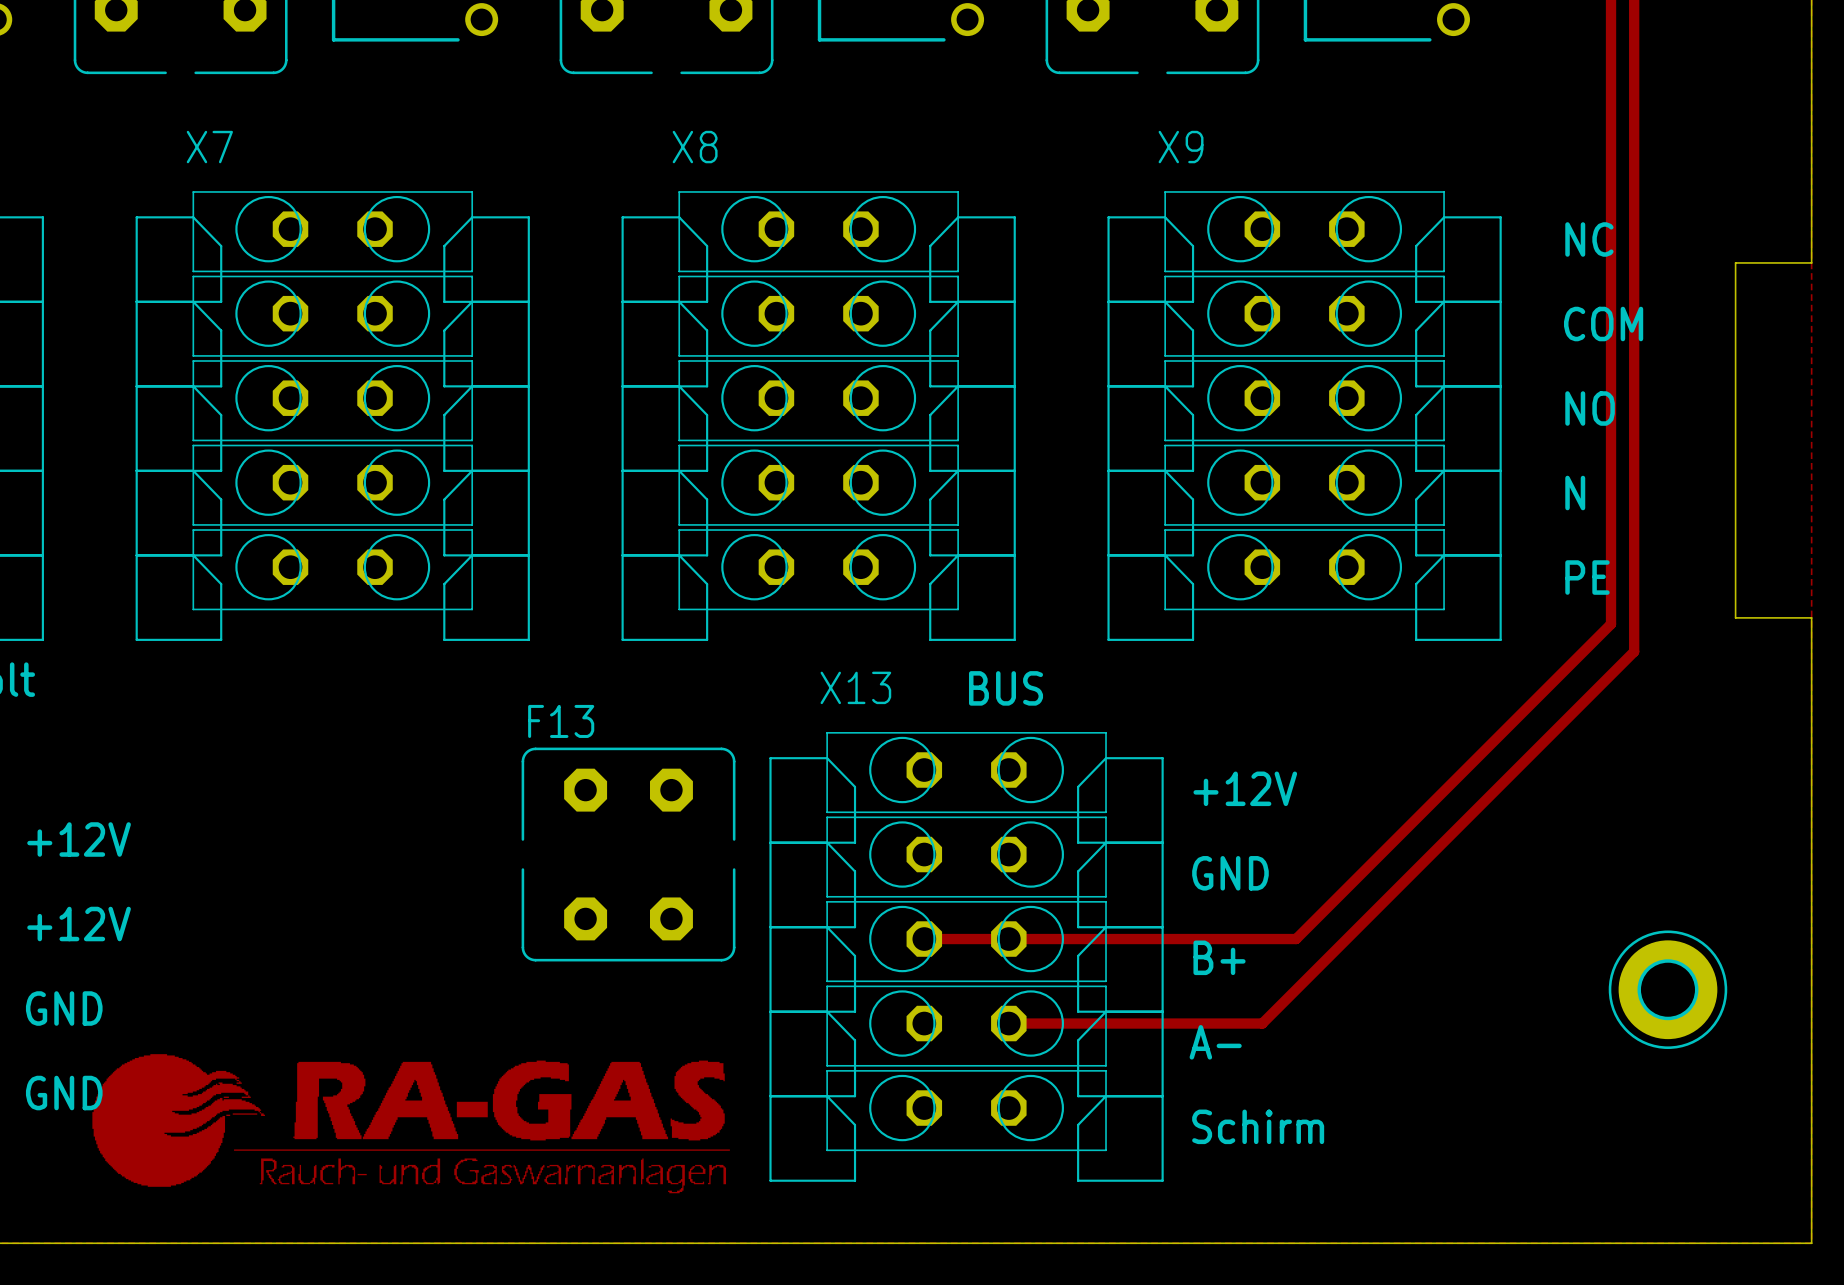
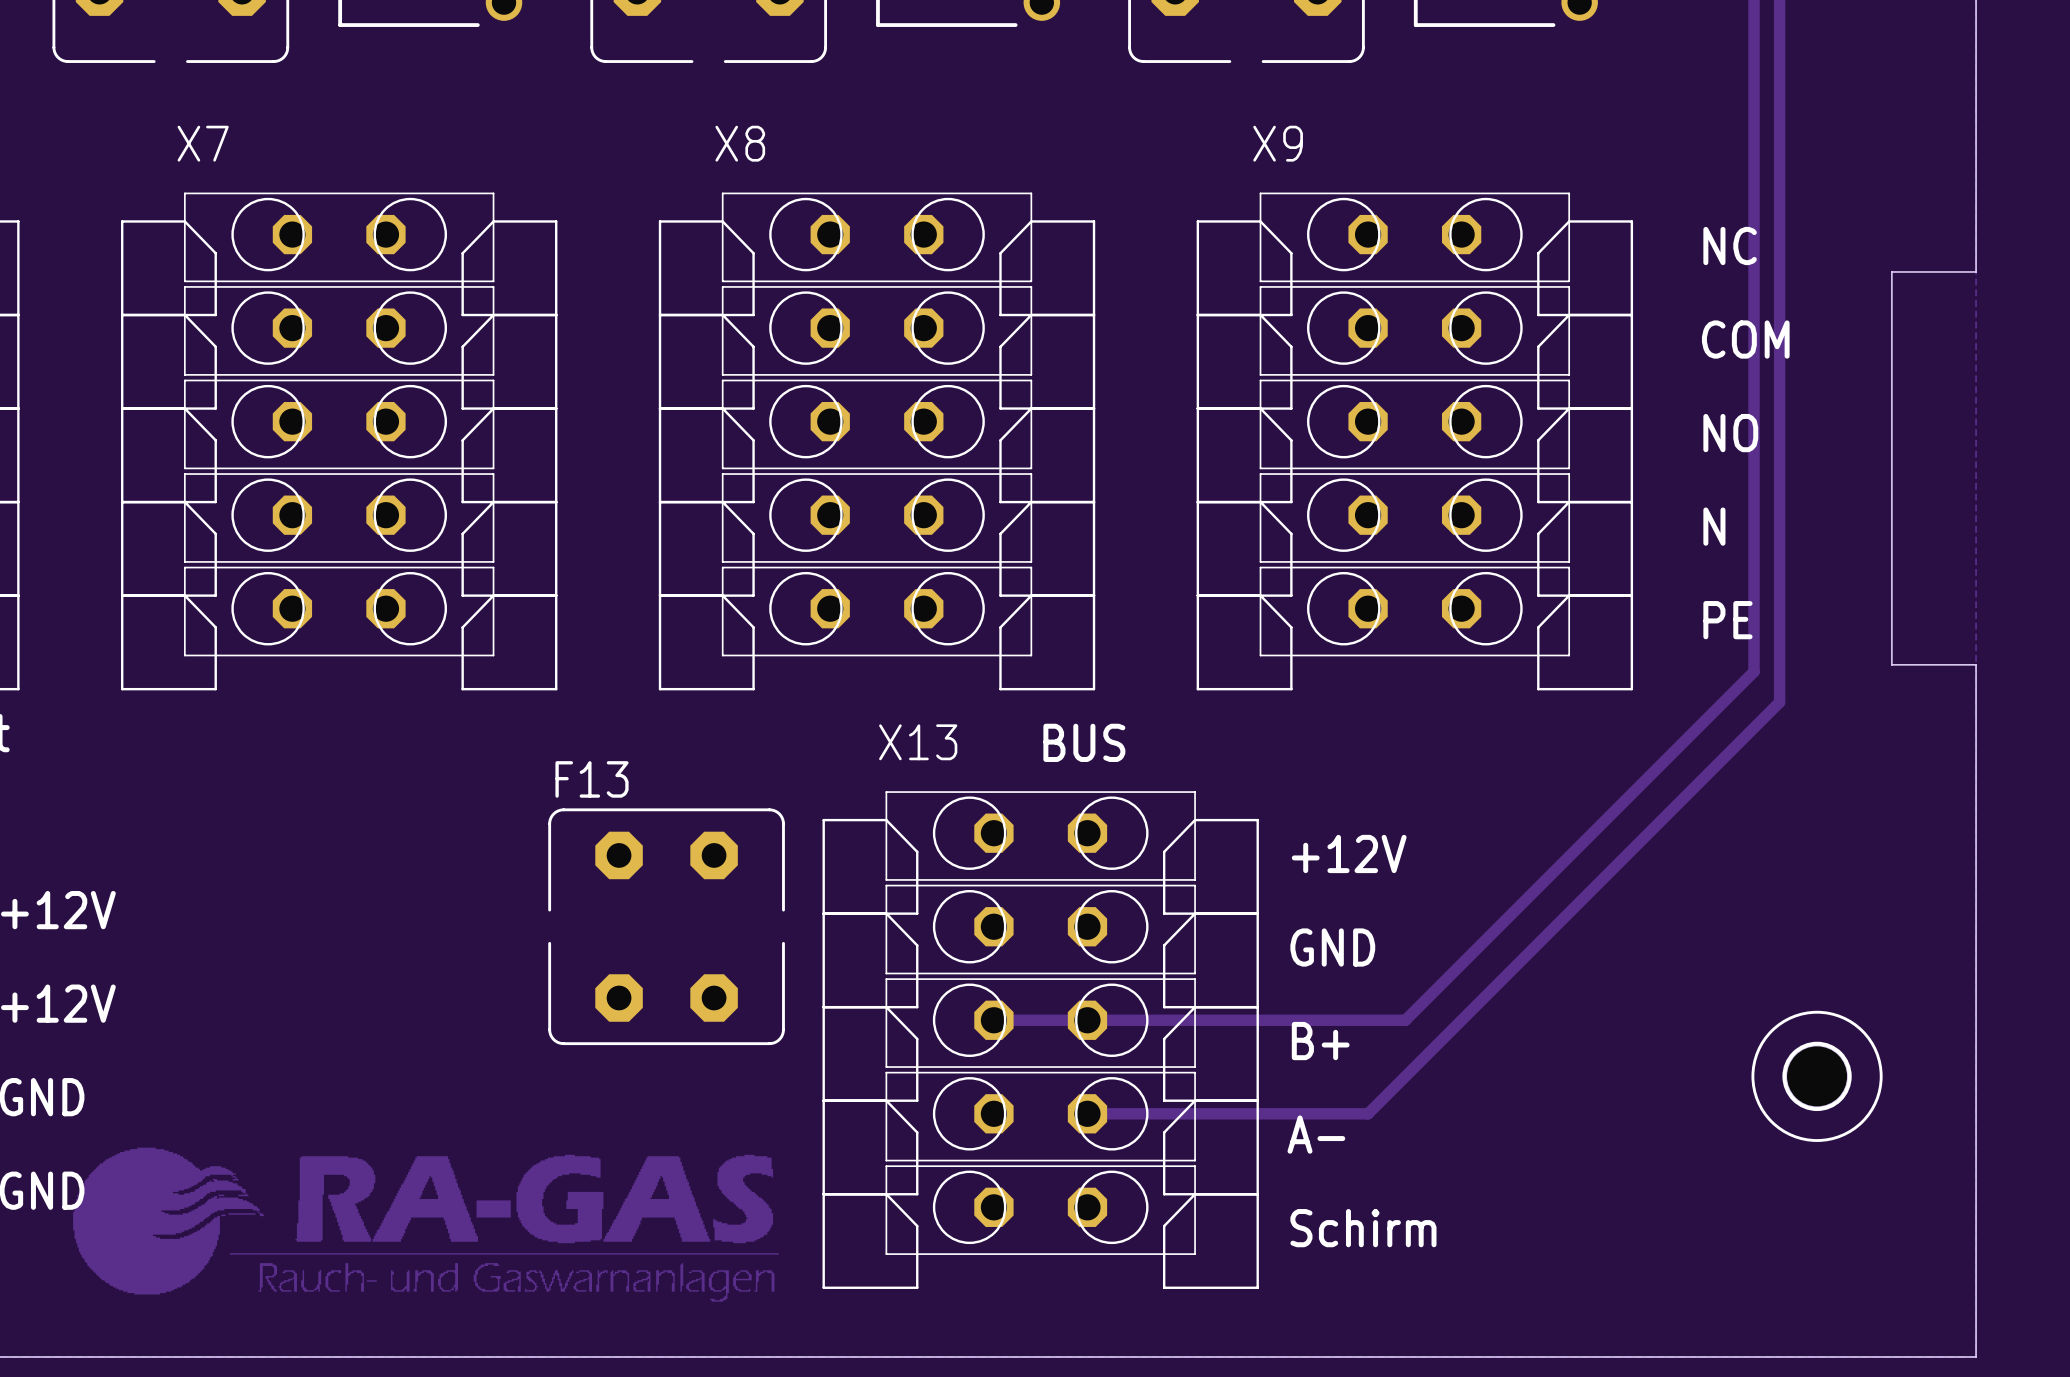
part footprint: [1608, 930, 1728, 1049] -> [1751, 1010, 1883, 1142]

